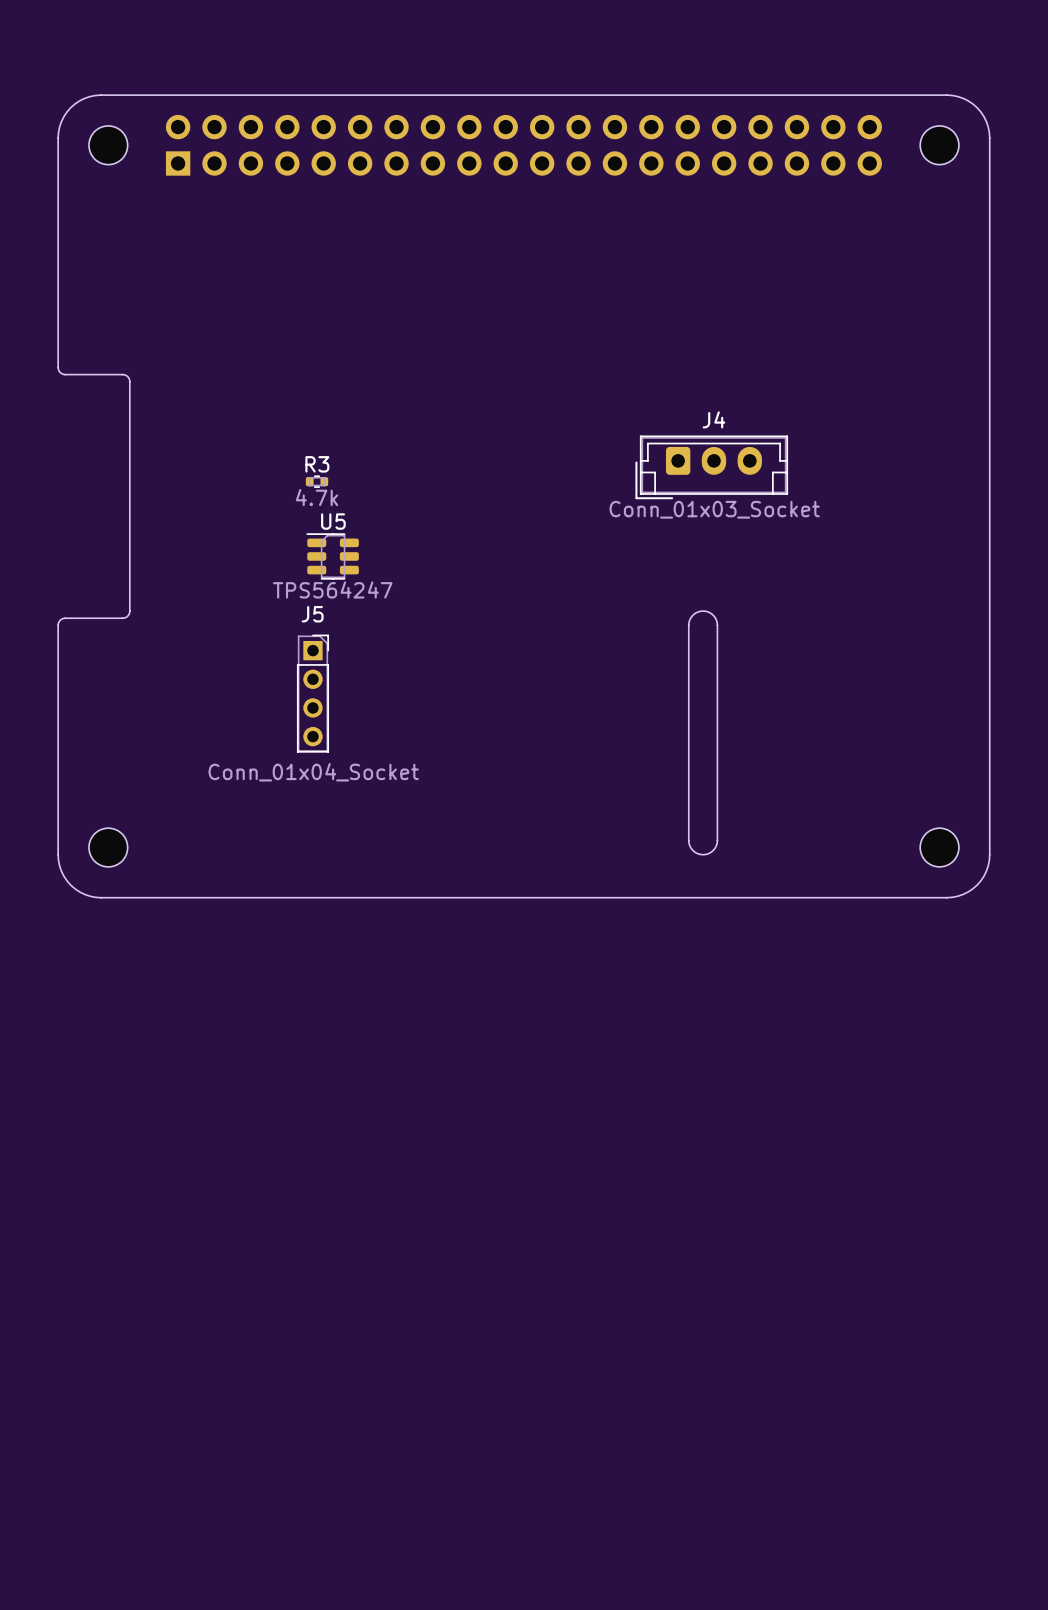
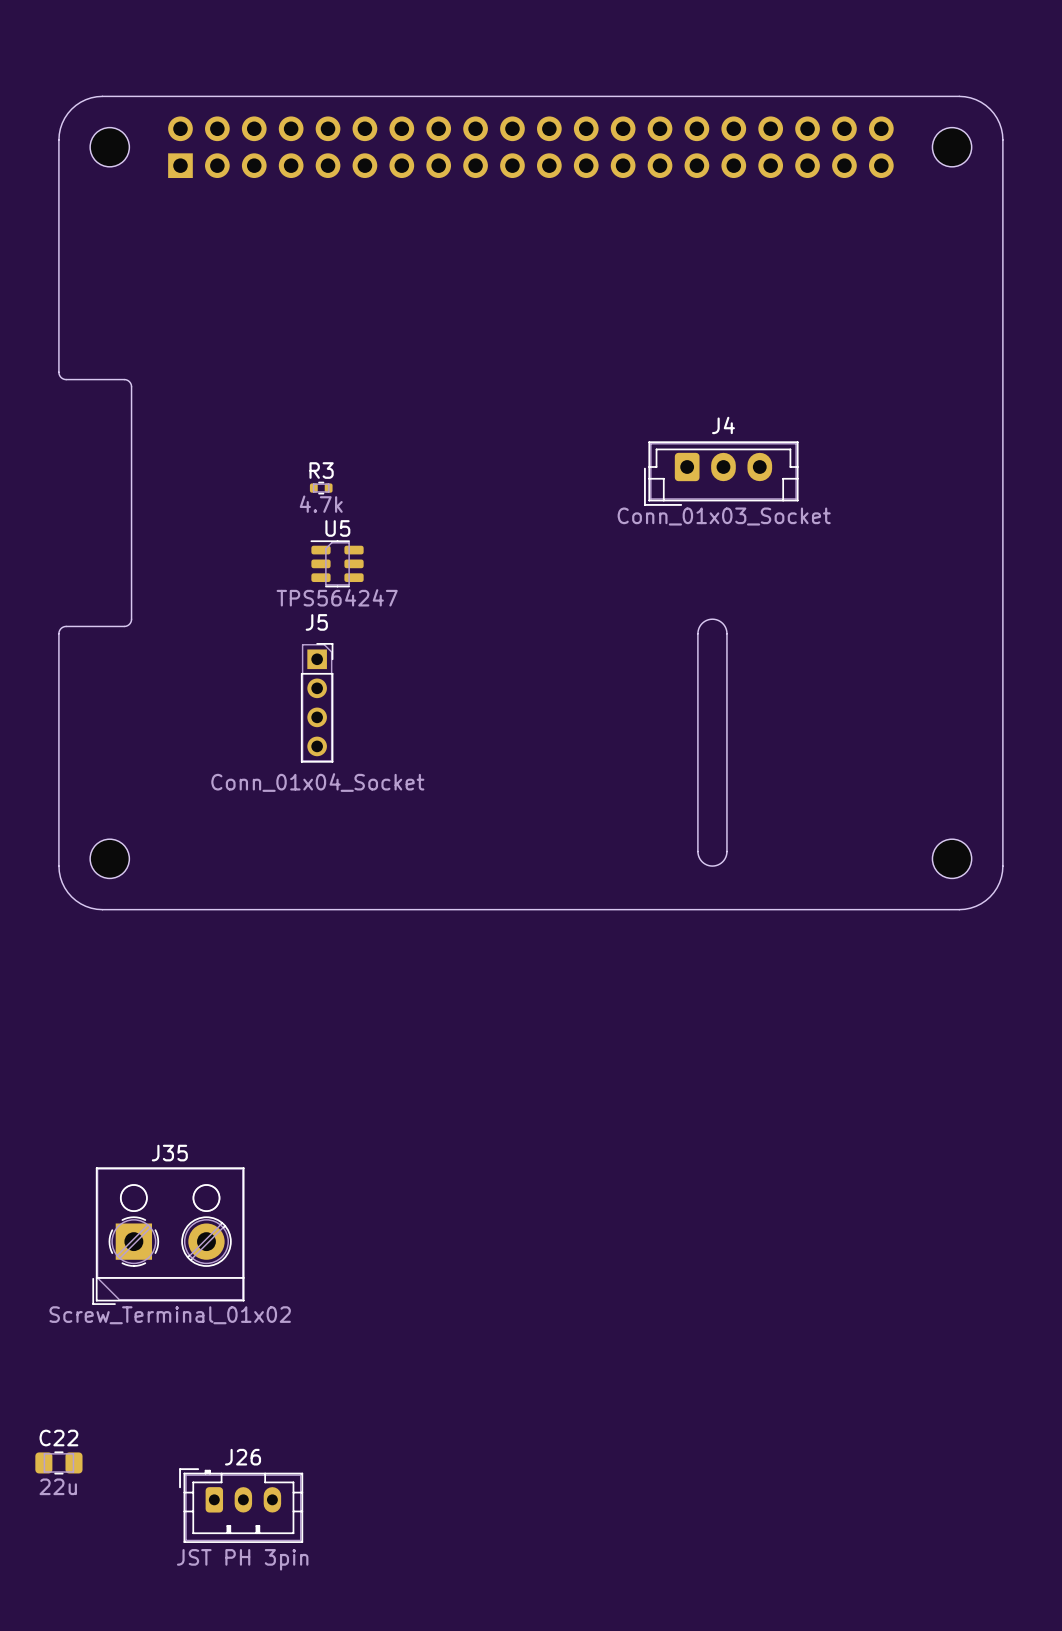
J35: none -> Screw_Terminal_01x02 (168, 1236)
C22: none -> 22u (58, 1462)
J26: none -> JST PH 3pin (241, 1505)

